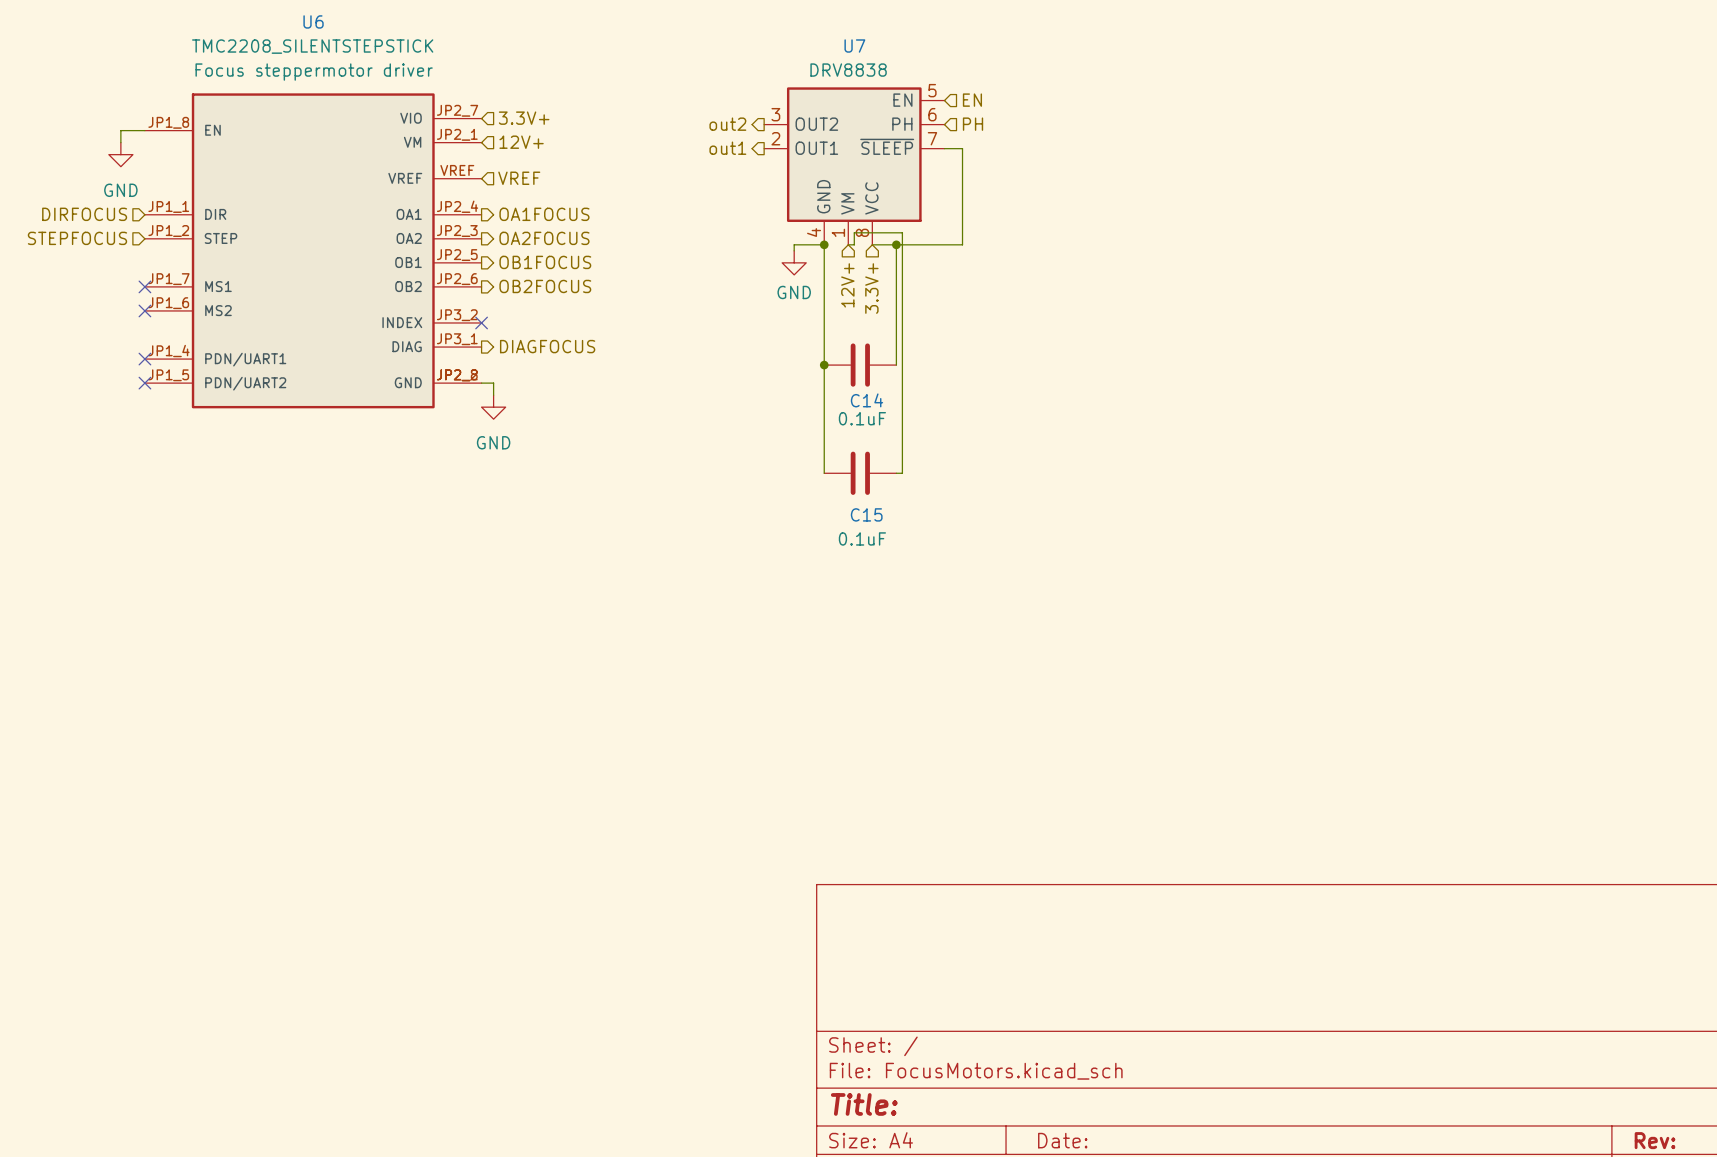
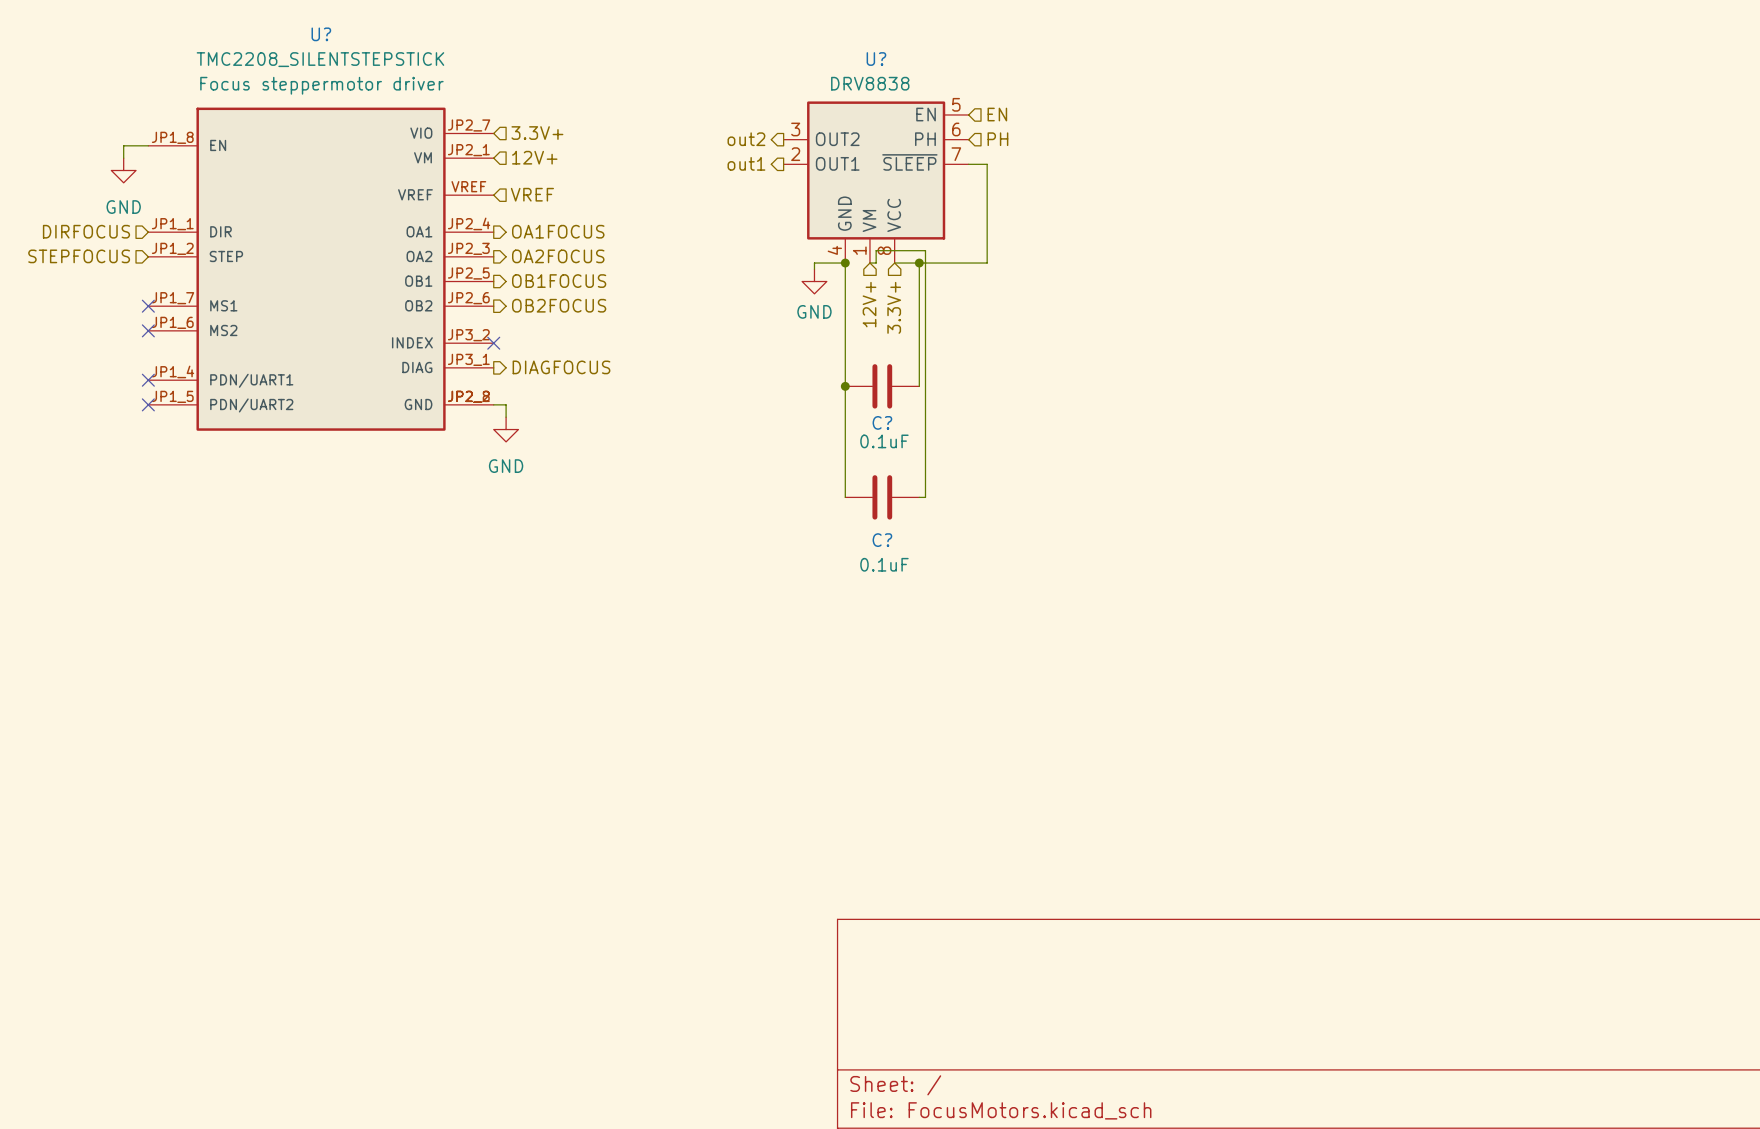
U6 name: U6 (313, 21) -> U? (321, 34)
U7 name: U7 (854, 46) -> U? (876, 59)
C14 name: C14 (866, 400) -> C? (882, 422)
C15 name: C15 (866, 514) -> C? (882, 540)

